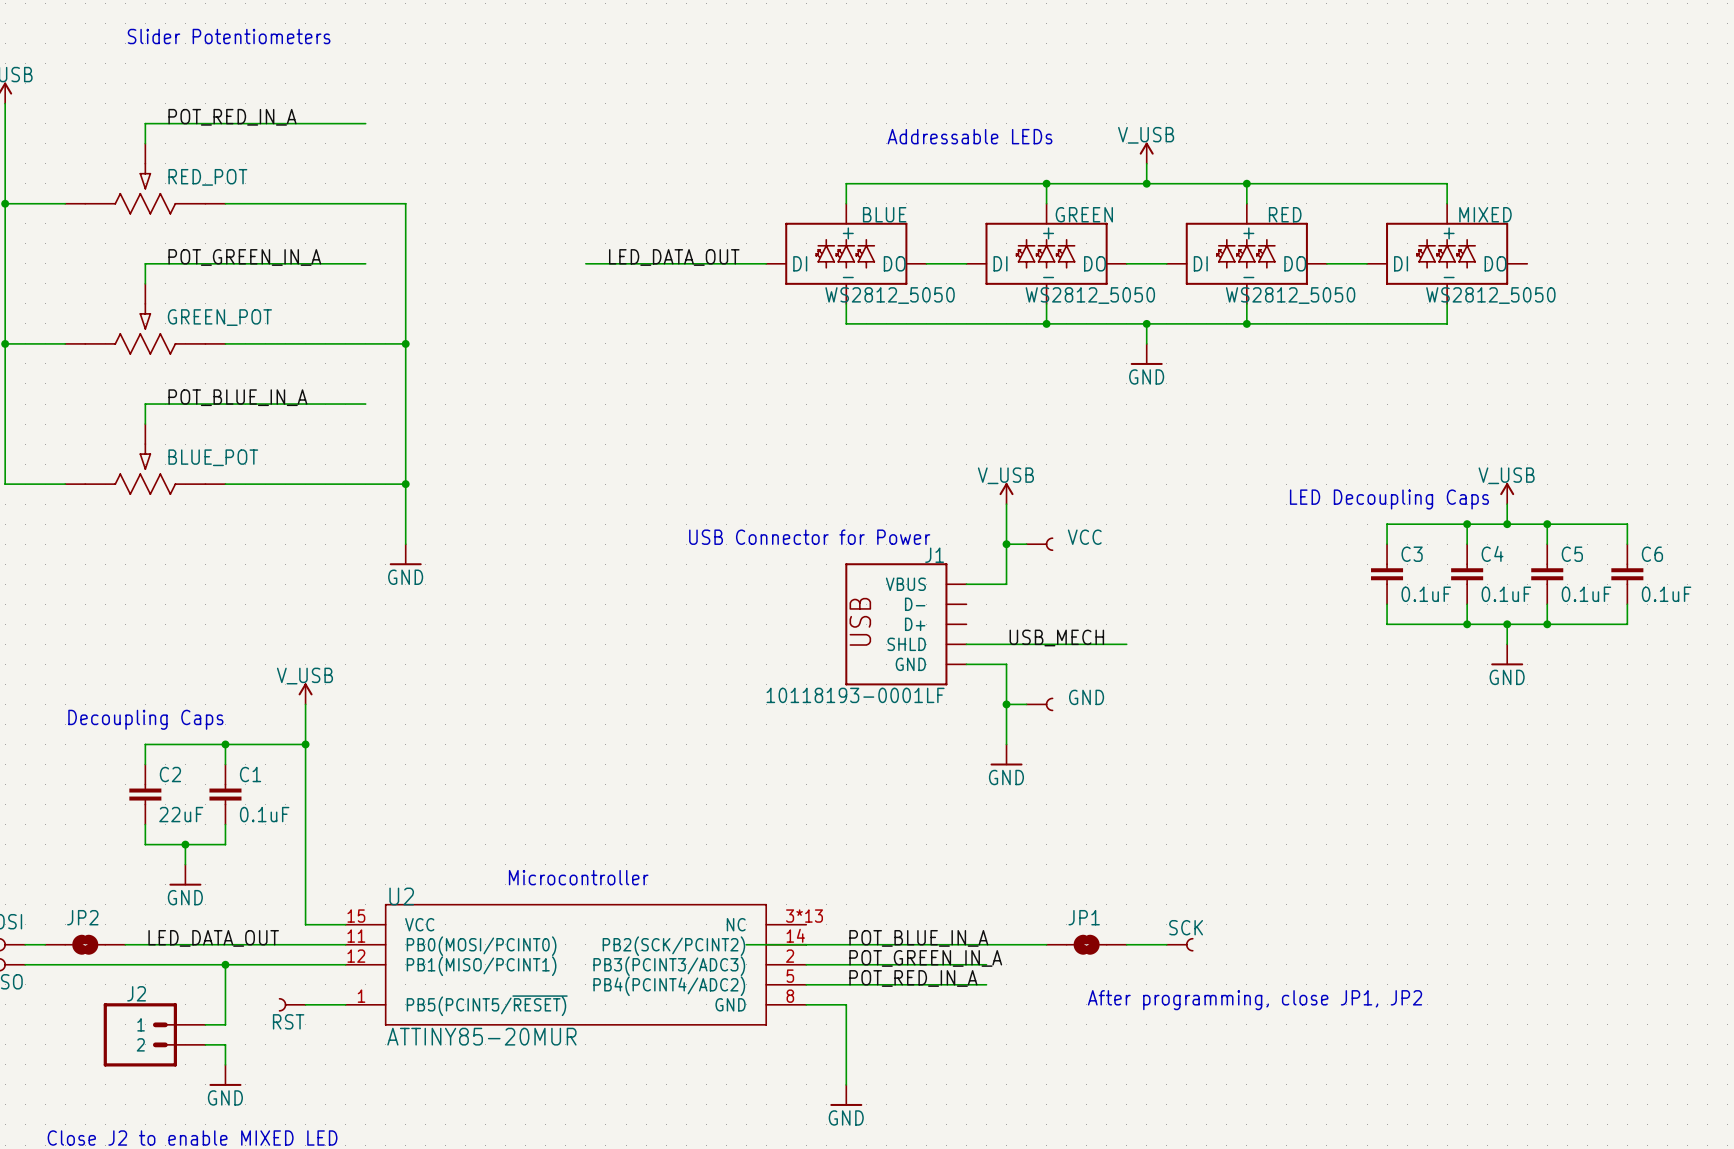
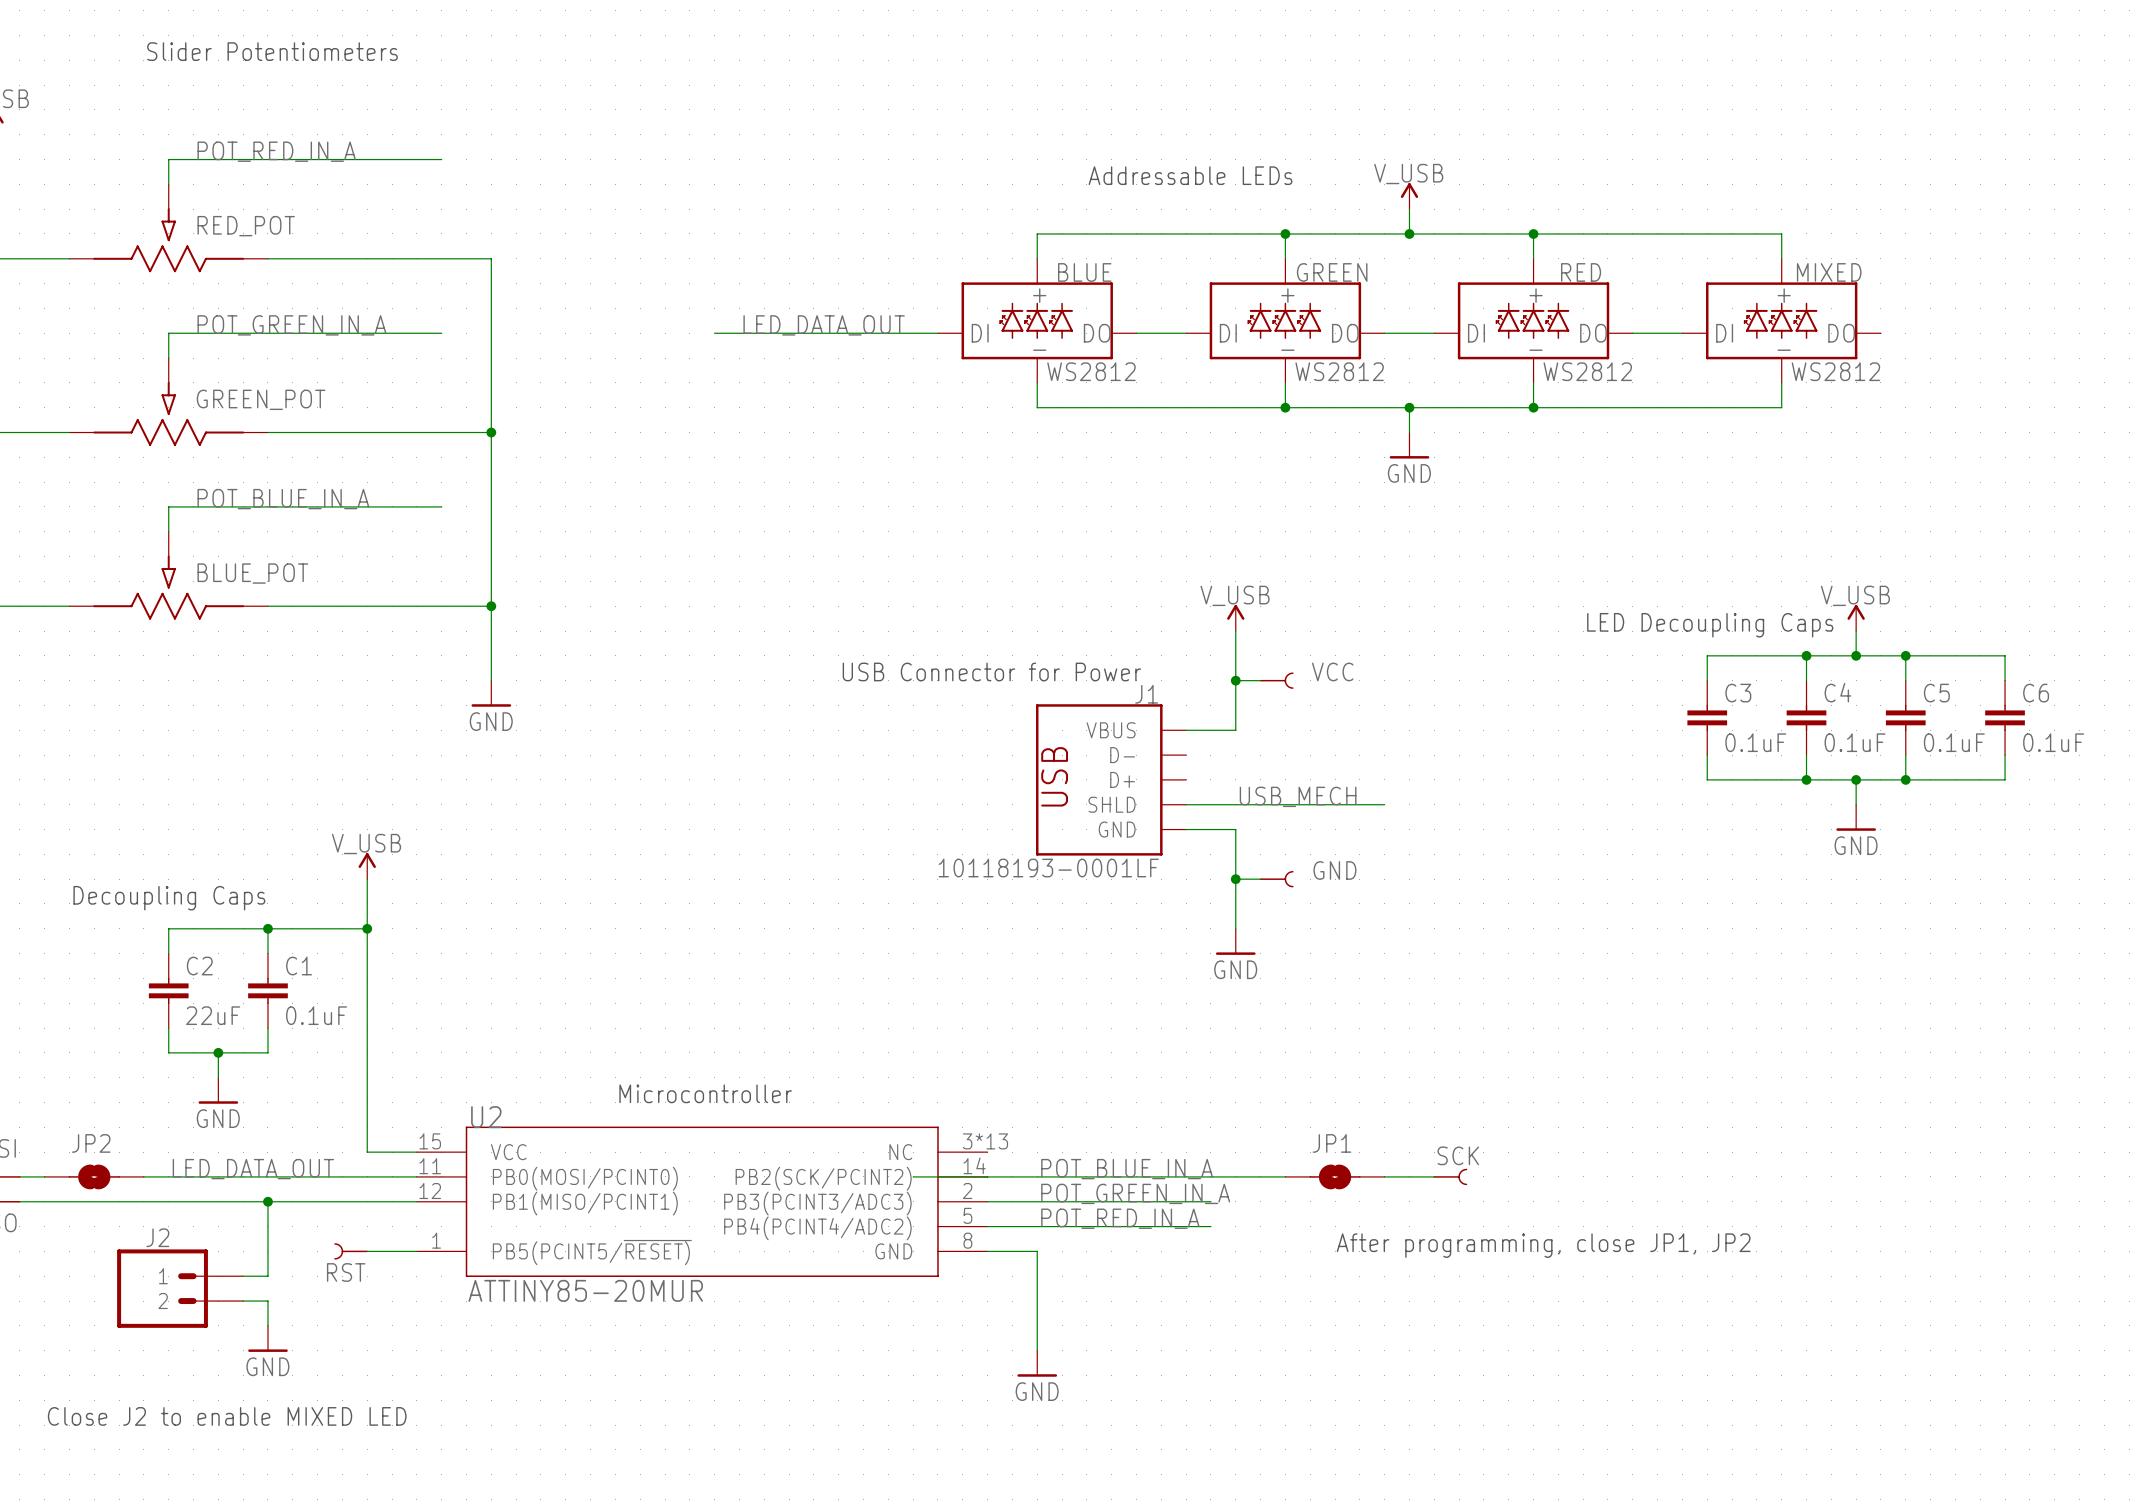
BLUE value: WS2812_5050 (890, 295) -> WS2812 (1091, 371)
GREEN value: WS2812_5050 (1090, 295) -> WS2812 (1339, 371)
RED value: WS2812_5050 (1290, 295) -> WS2812 (1587, 371)
MIXED value: WS2812_5050 (1490, 295) -> WS2812 (1835, 371)

